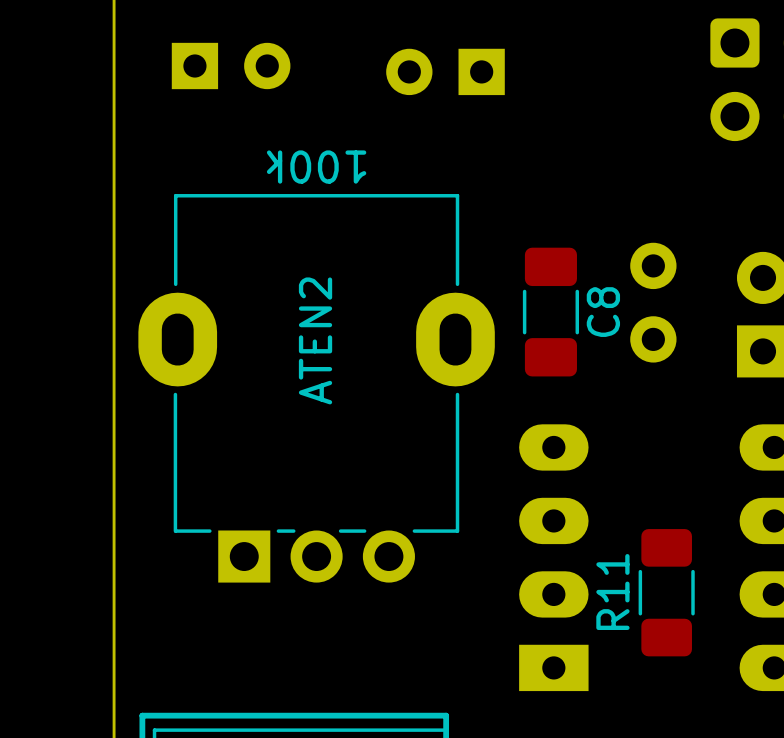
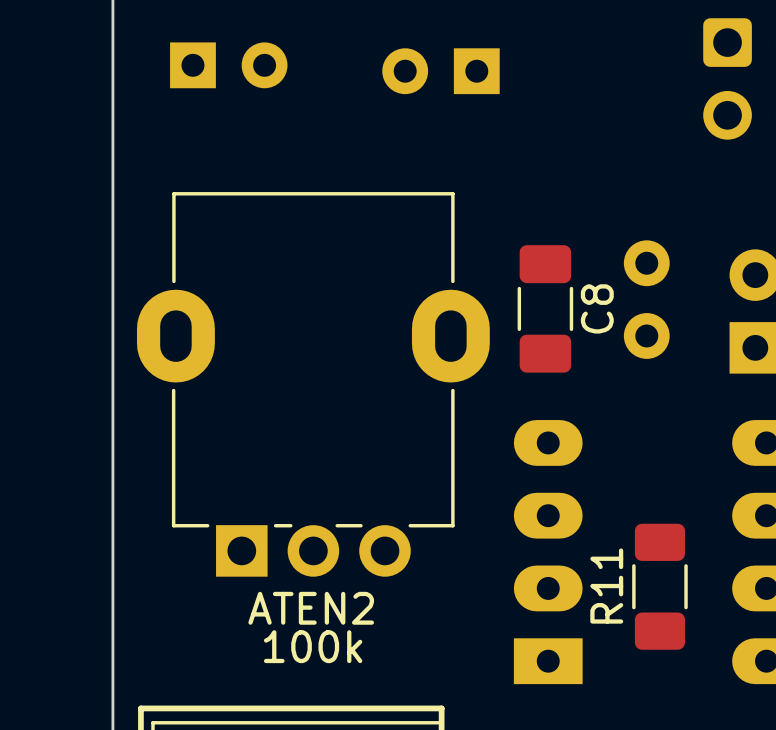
ATEN2 value rotation: 0° (316, 167) -> 180° (313, 646)
ATEN2 value position: 100k (316, 167) -> 100k (313, 646)
ATEN2 name rotation: 0° (315, 340) -> 90° clockwise (311, 608)
ATEN2 name position: ATEN2 (315, 340) -> ATEN2 (311, 608)

